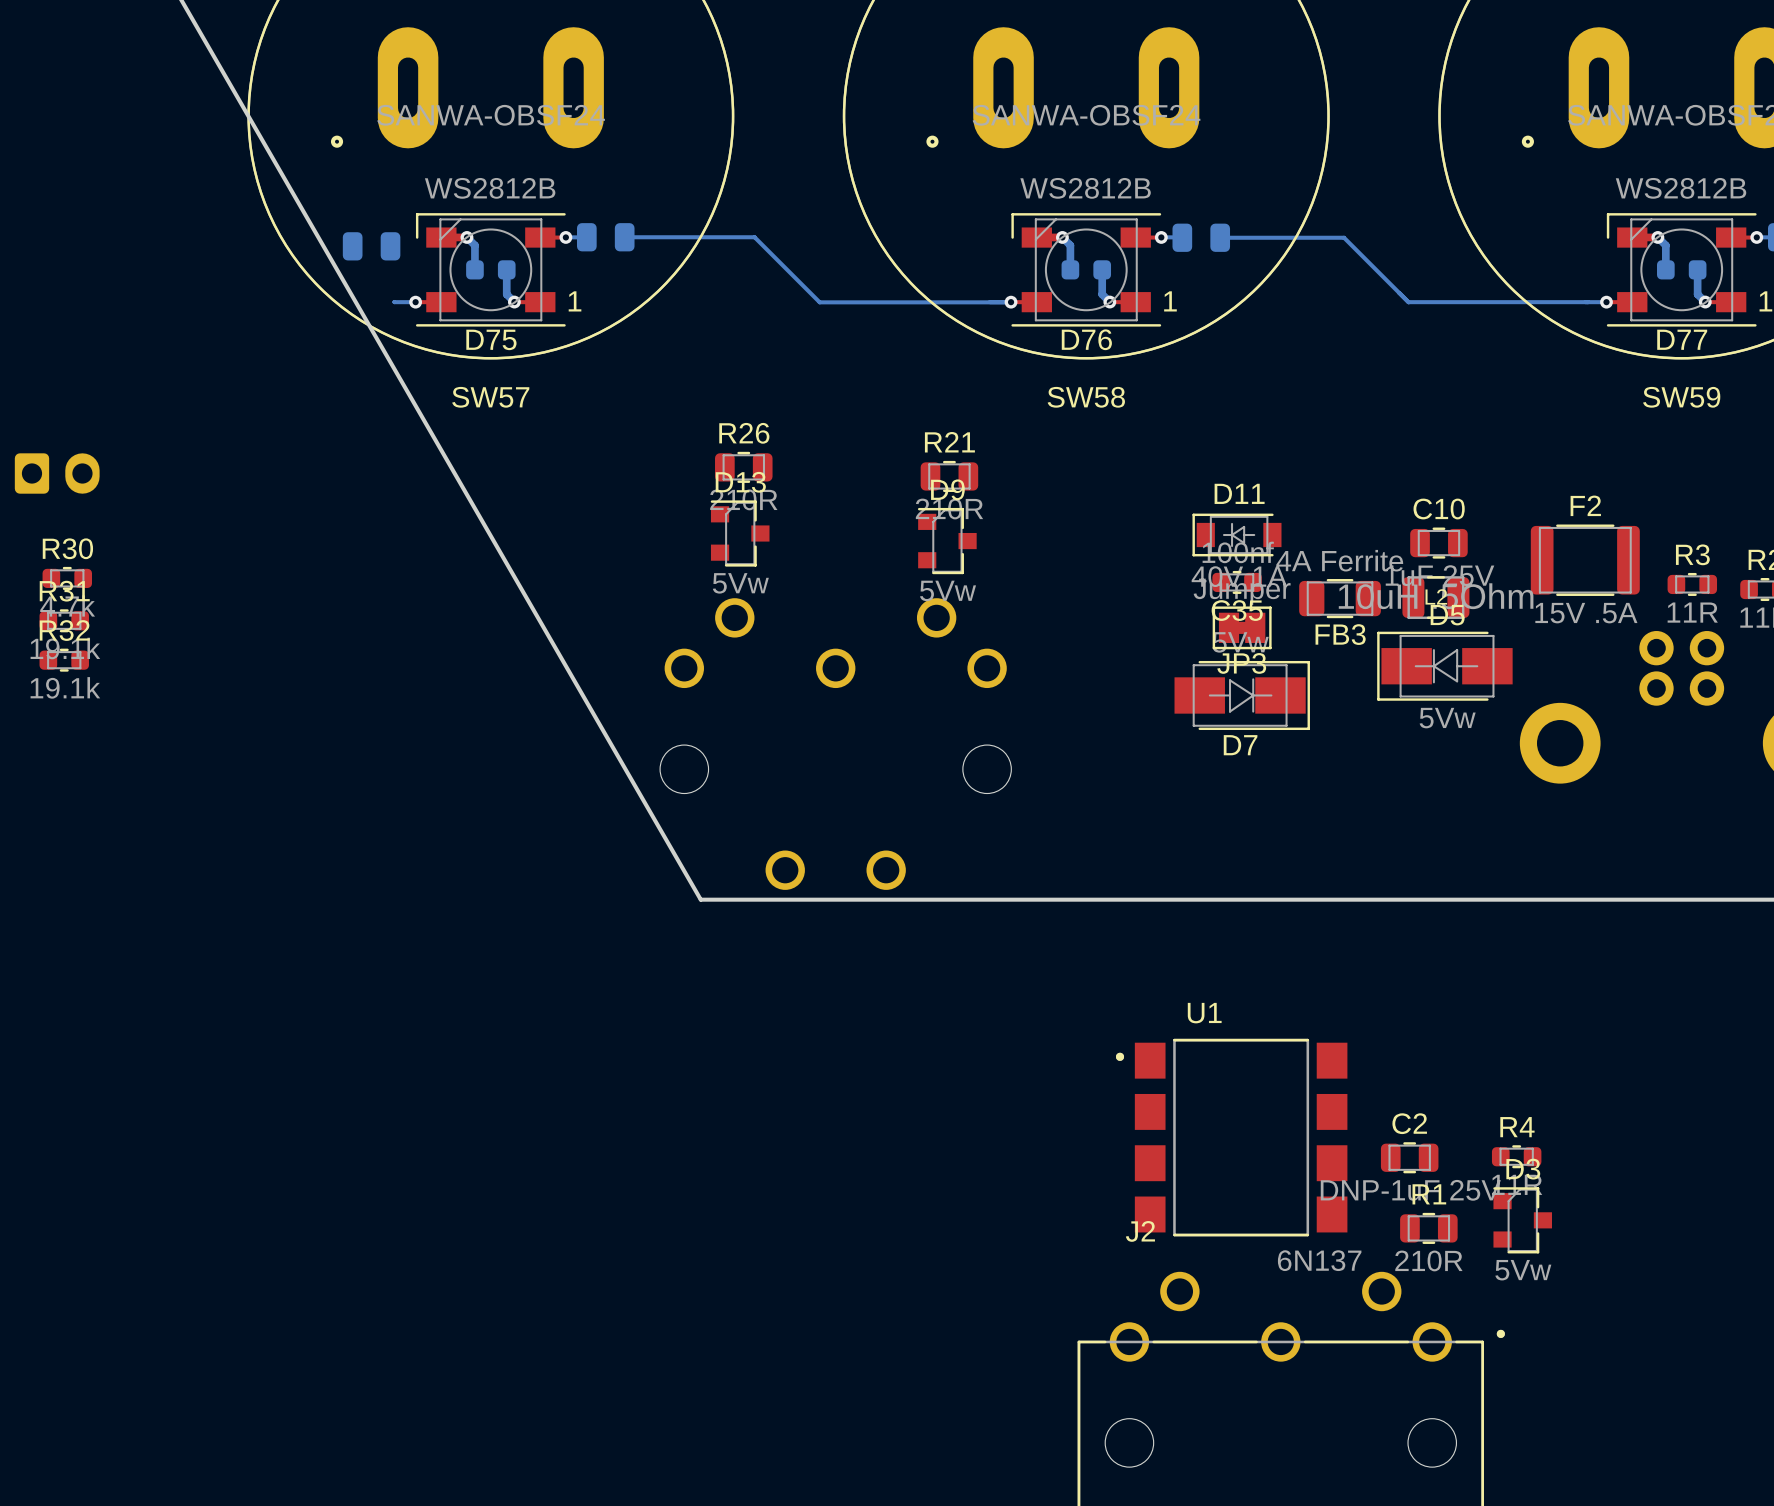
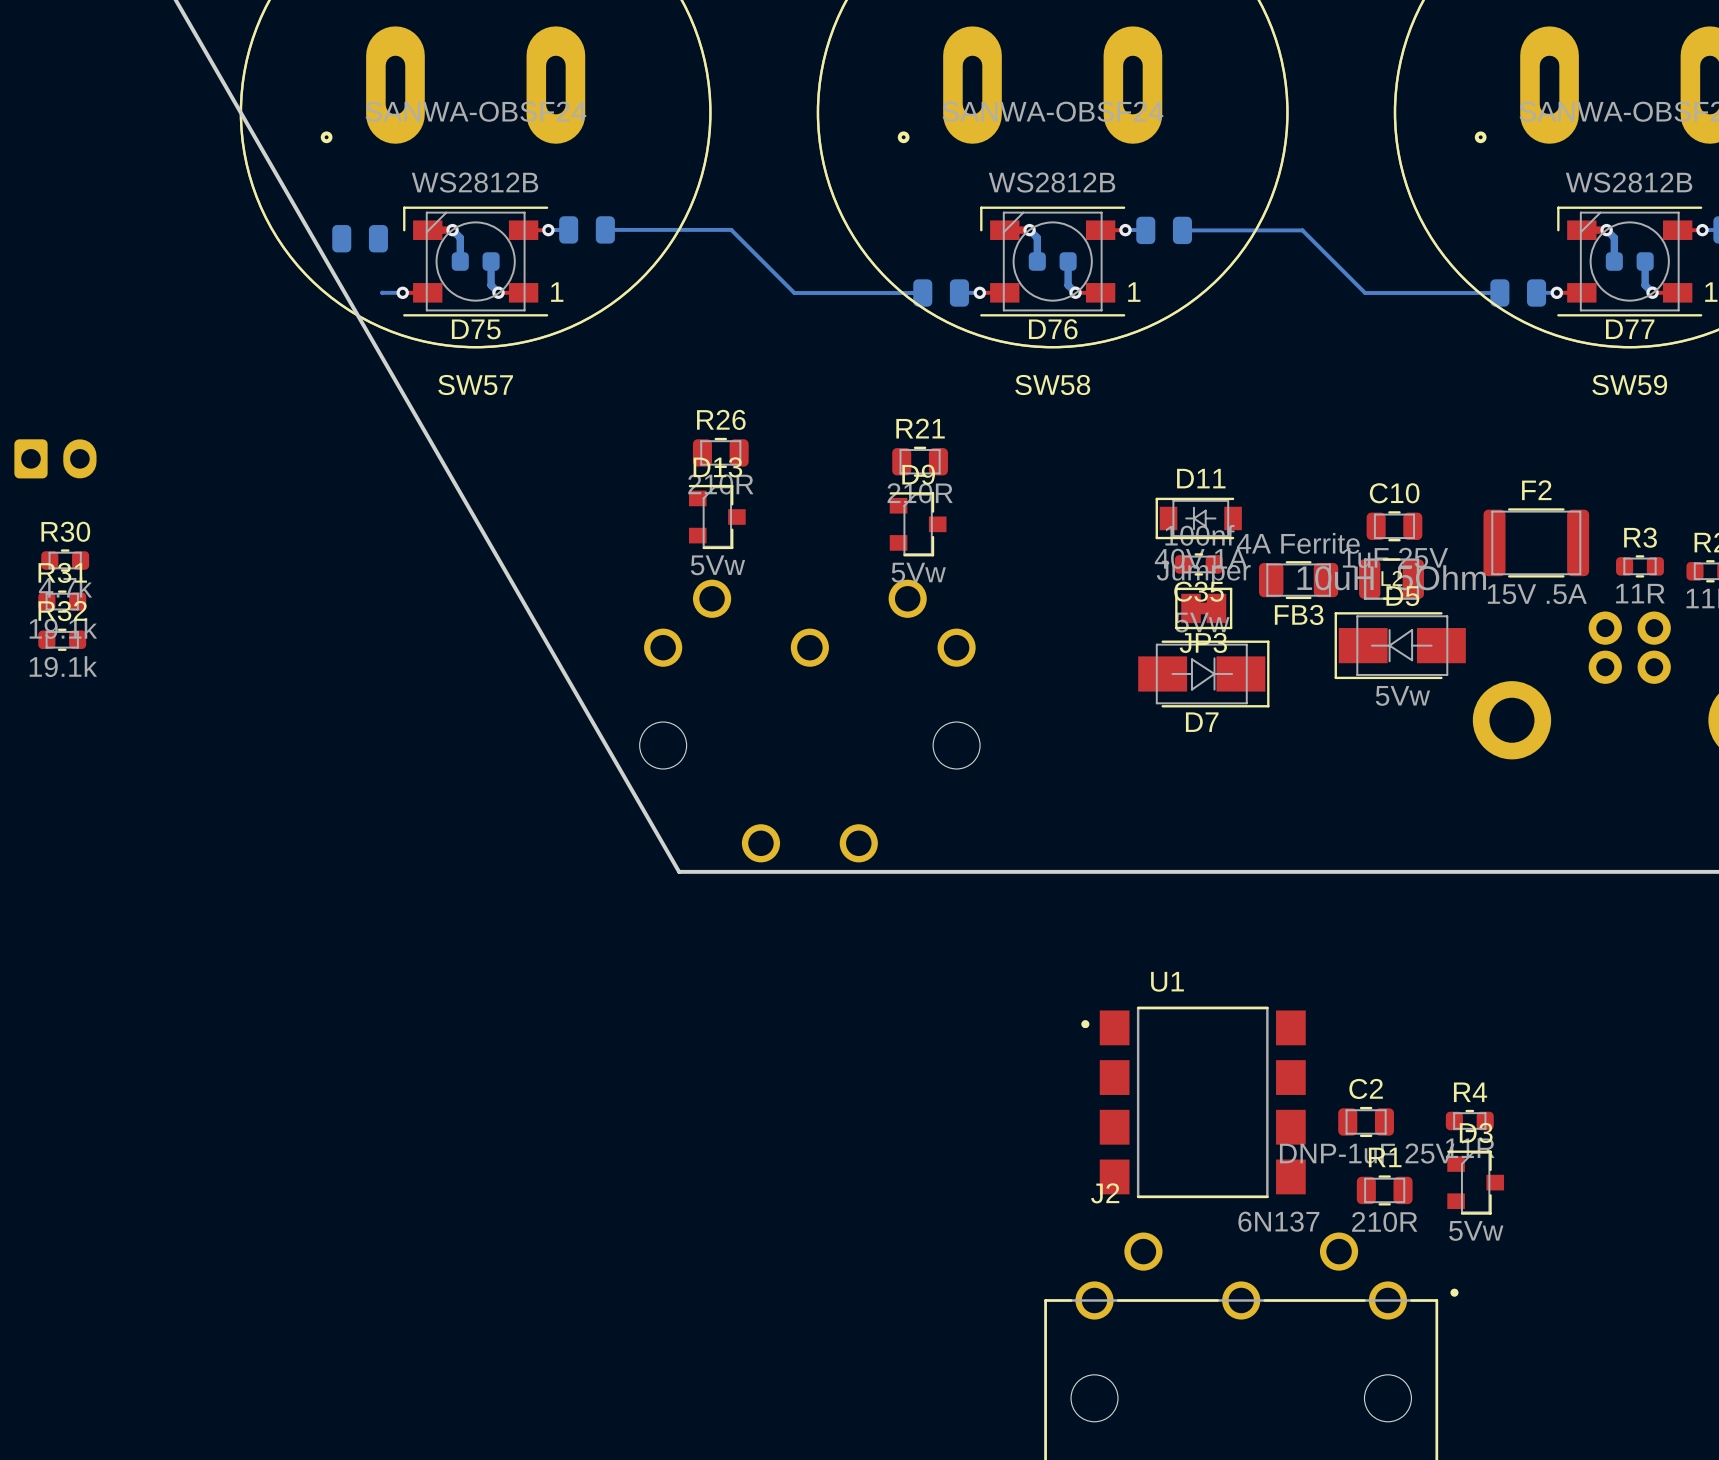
bottom track: (952, 302) (1010, 302) -> none
part: none -> (941, 293)
bottom track: (1408, 302) (1585, 302) -> (1365, 293) (1499, 293)
part: none -> (1518, 293)

